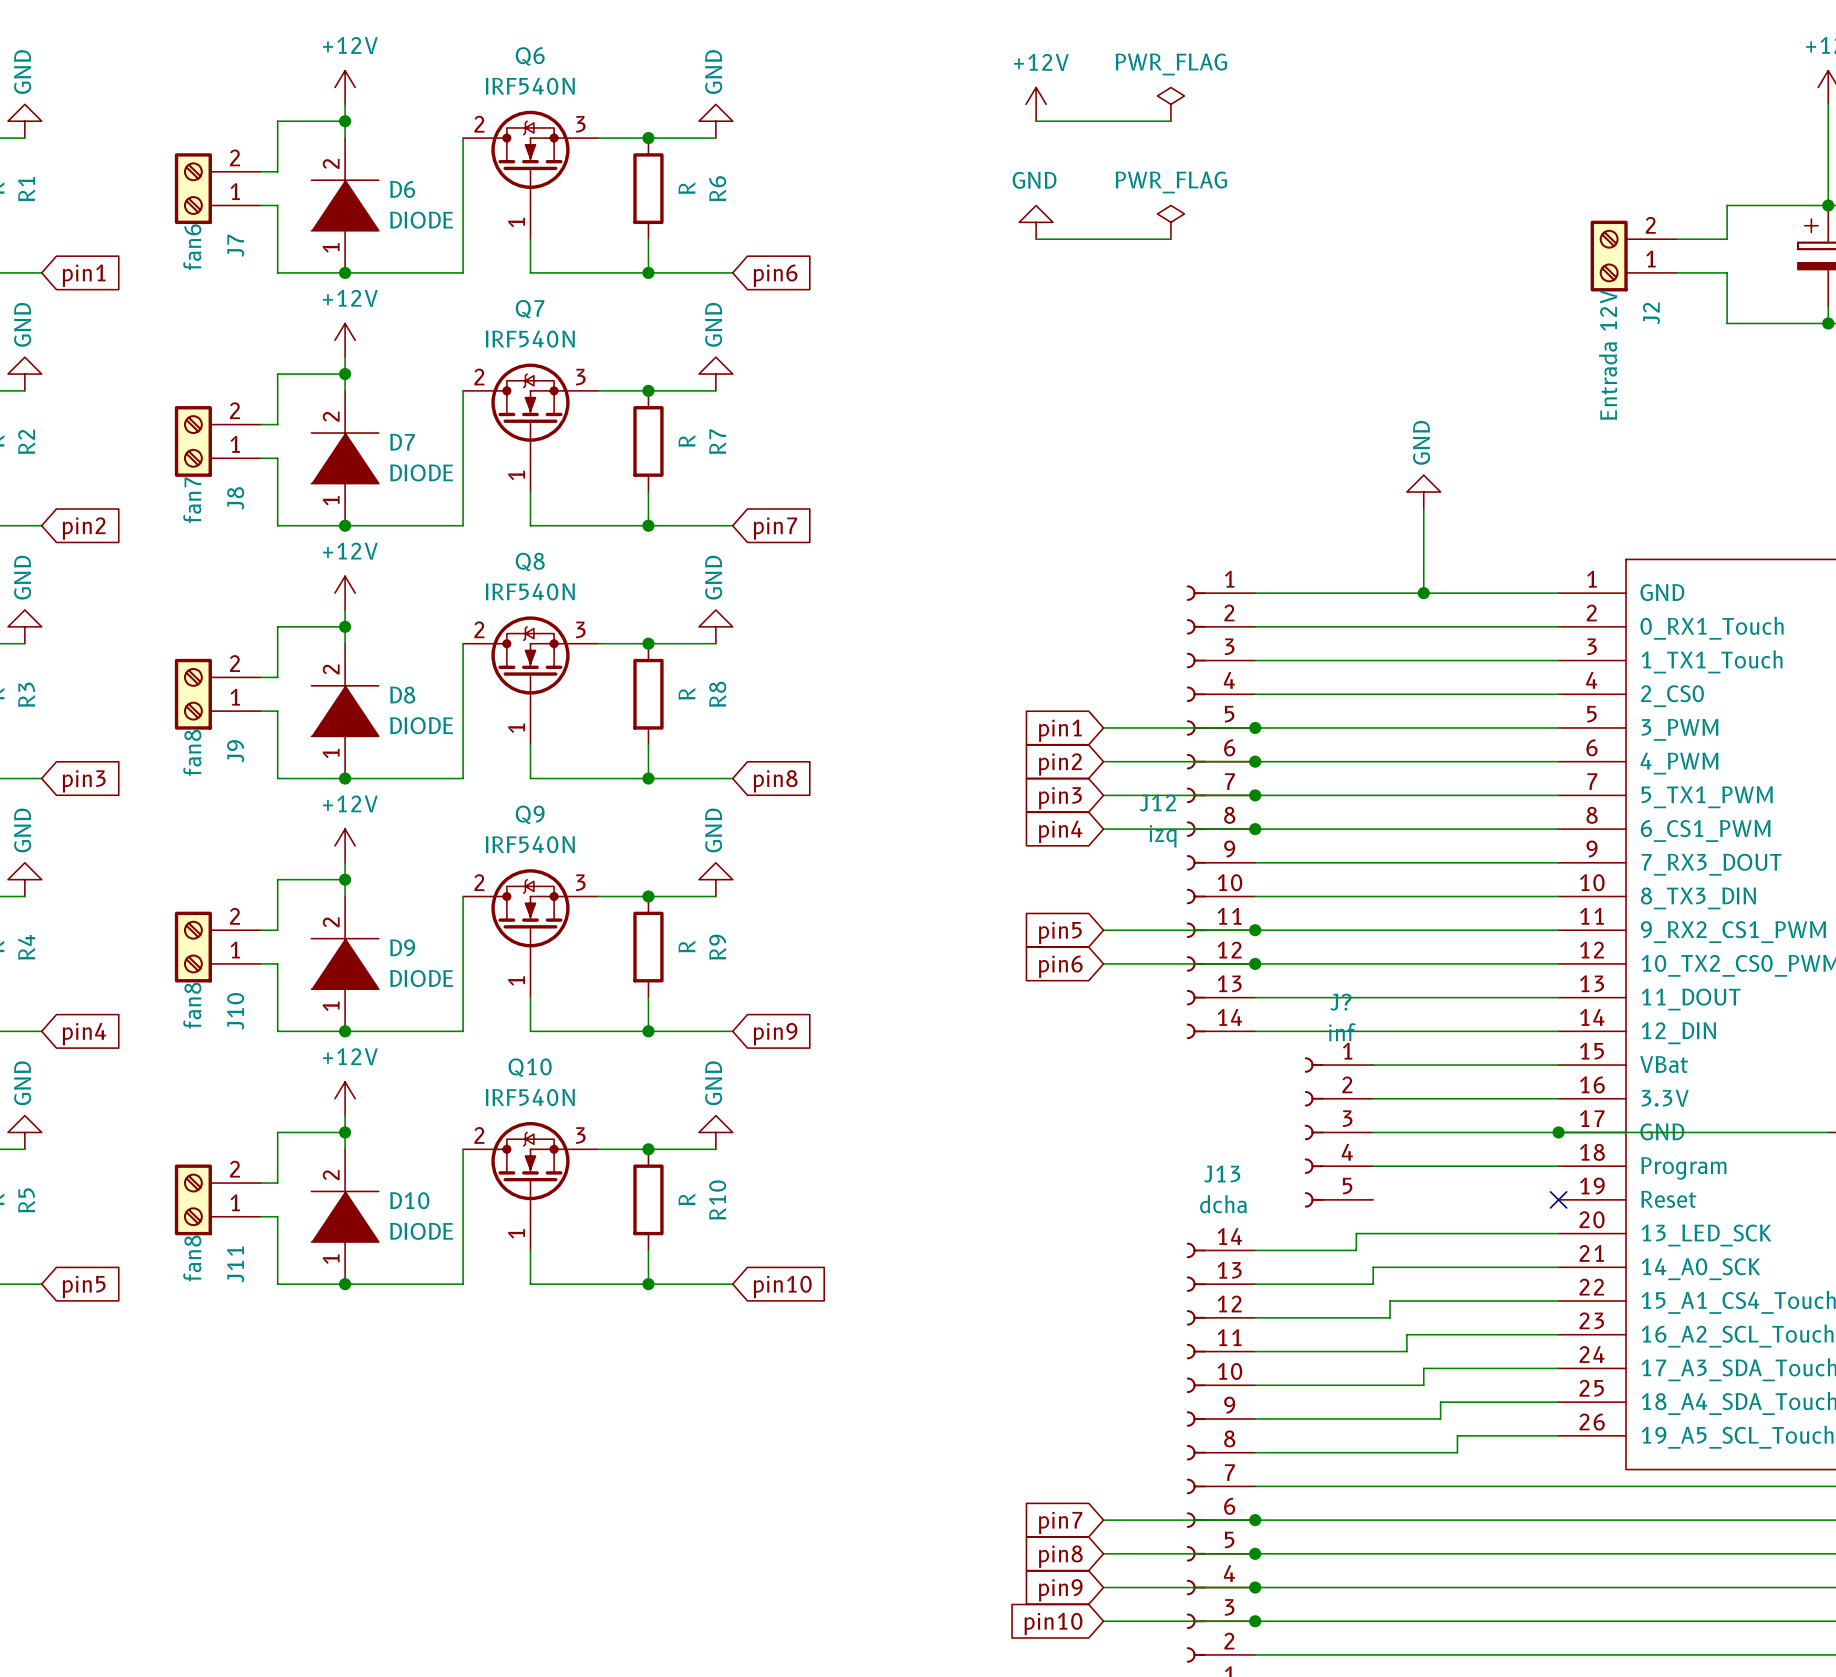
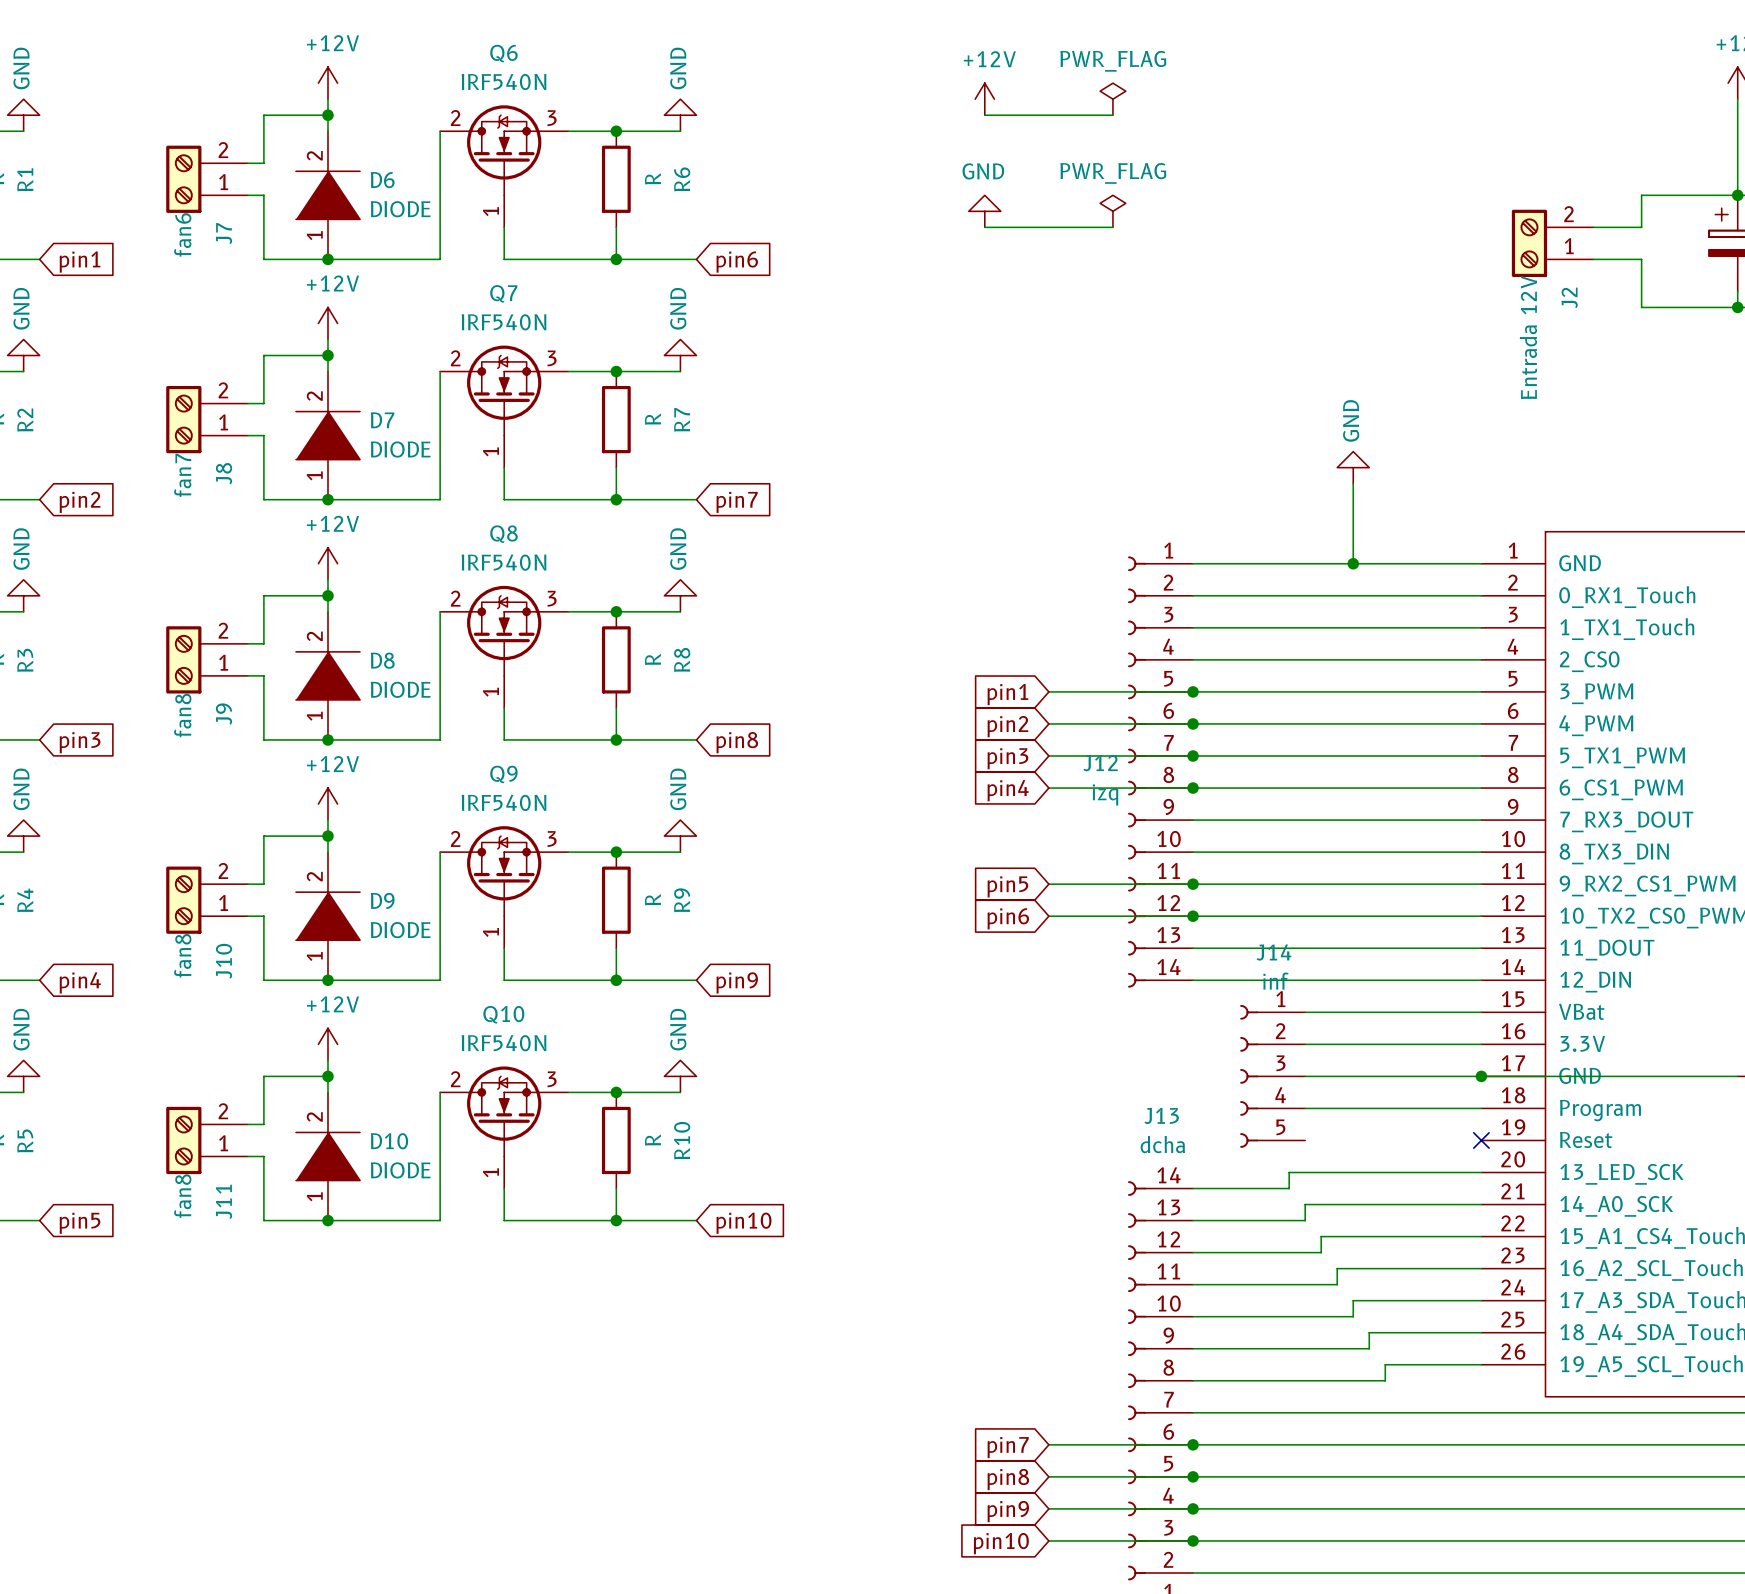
J? name: J? (1340, 1002) -> J14 (1274, 952)

